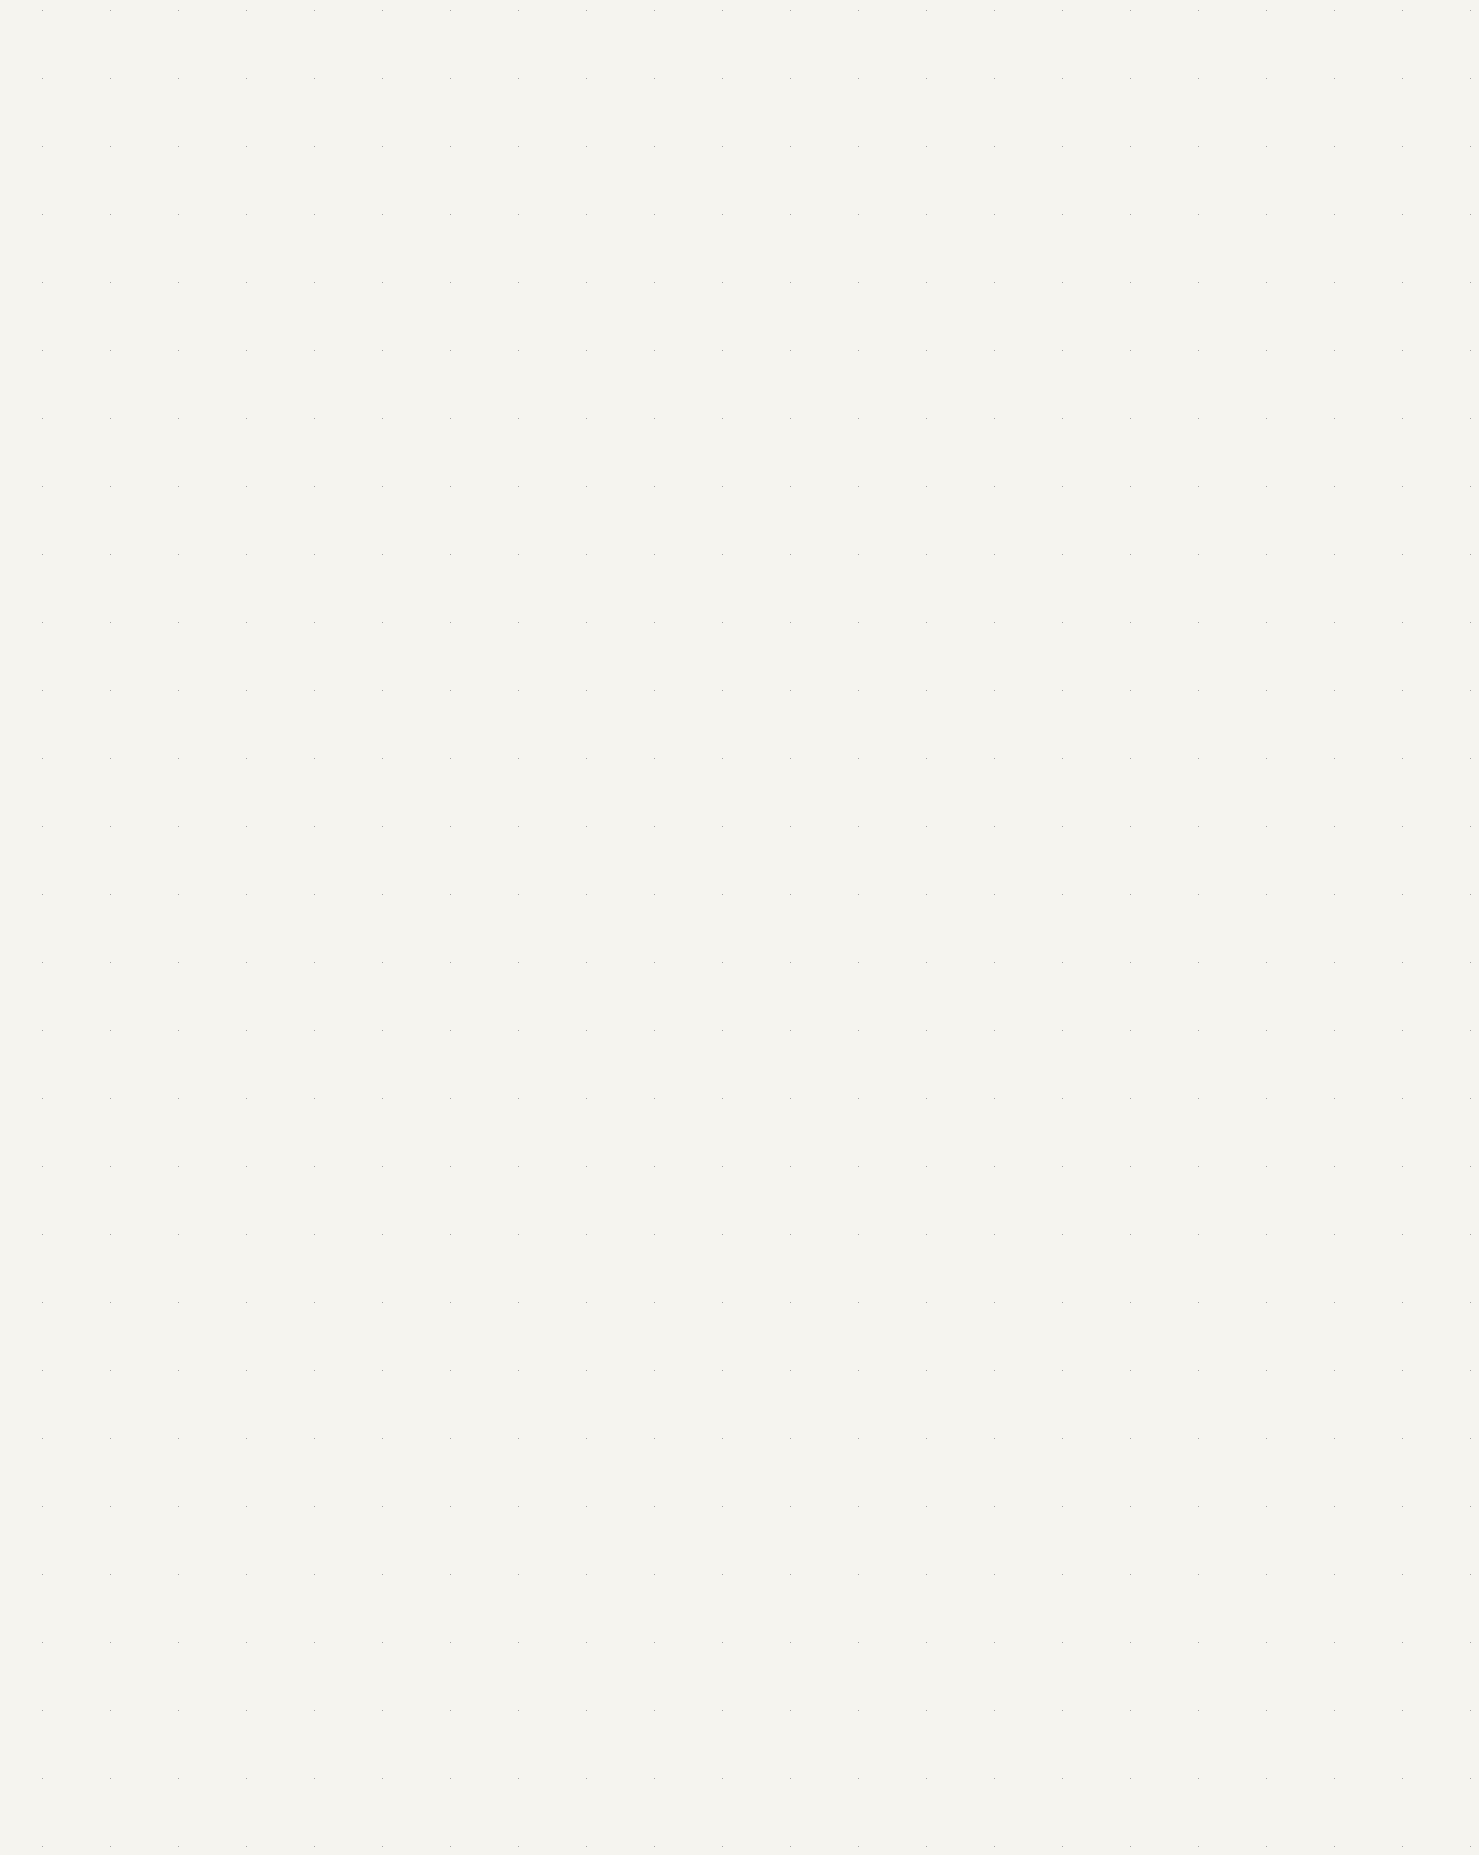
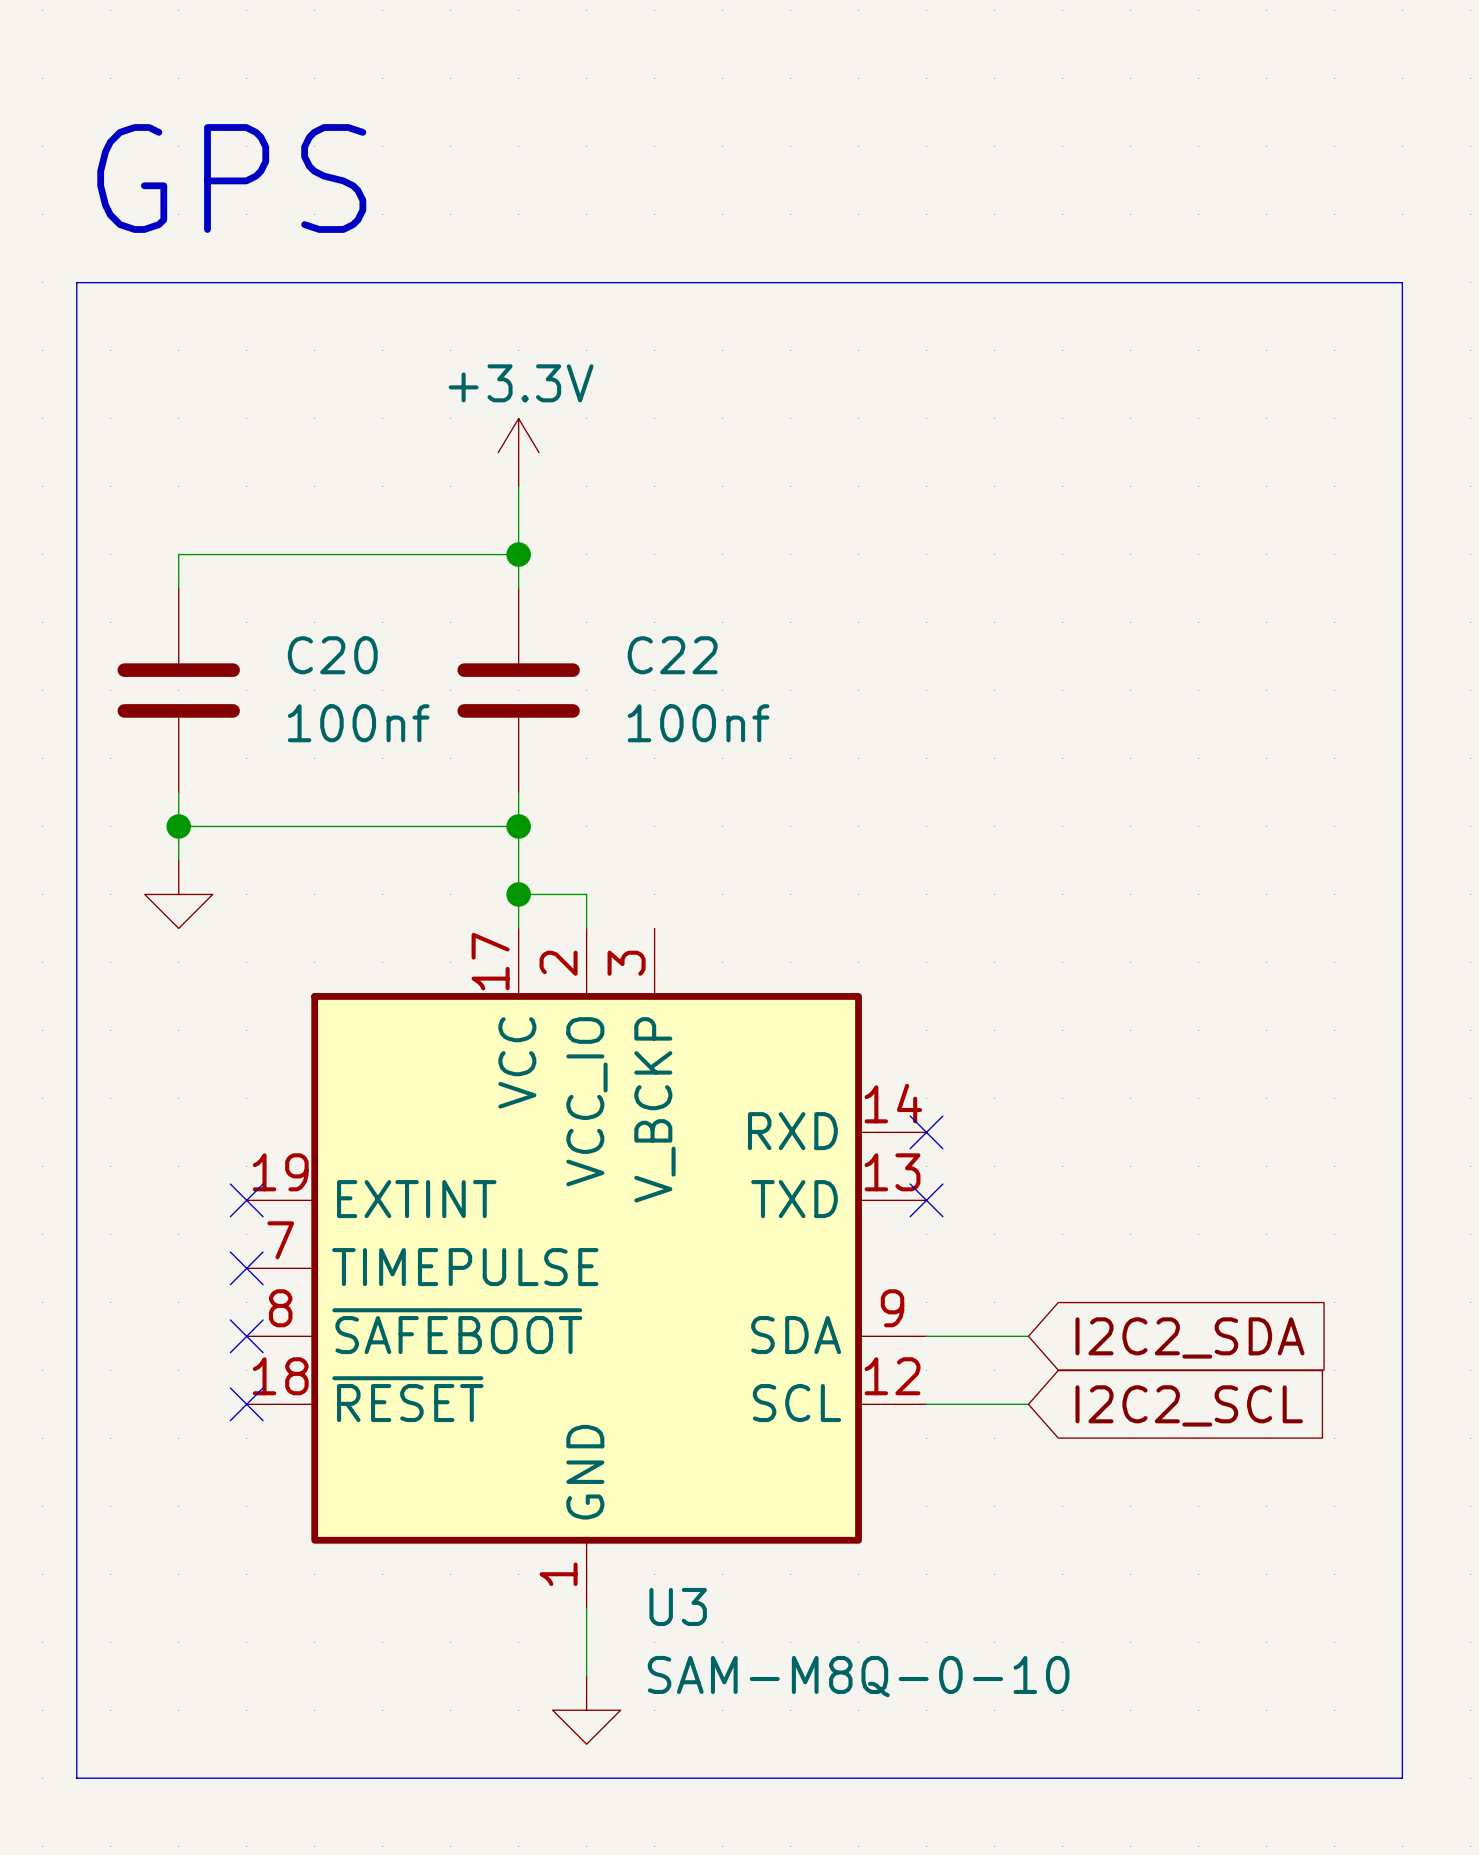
text: none -> GPS (231, 178)
line: none -> (76, 282) (1402, 282) (1402, 1778) (76, 1778) (76, 282)
power symbol: none -> +3.3V (518, 452)
wire: none -> (518, 486) (518, 588)
wire: none -> (518, 554) (178, 554) (178, 588)
junction: none -> (518, 554)
C20: none -> 100nf (178, 690)
C22: none -> 100nf (518, 690)
wire: none -> (178, 792) (178, 860)
wire: none -> (518, 792) (518, 928)
wire: none -> (178, 826) (518, 826)
junction: none -> (178, 826)
junction: none -> (518, 826)
power symbol: none -> (178, 894)
wire: none -> (518, 894) (586, 894) (586, 928)
junction: none -> (518, 894)
no-connect mark: none -> (926, 1132)
no-connect mark: none -> (246, 1200)
no-connect mark: none -> (926, 1200)
no-connect mark: none -> (246, 1268)
U3: none -> SAM-M8Q-0-10 (586, 1268)
no-connect mark: none -> (246, 1336)
wire: none -> (926, 1336) (1028, 1336)
global label: none -> I2C2_SDA (1189, 1337)
no-connect mark: none -> (246, 1404)
wire: none -> (926, 1404) (1028, 1404)
global label: none -> I2C2_SCL (1189, 1405)
wire: none -> (586, 1608) (586, 1676)
power symbol: none -> (586, 1710)

